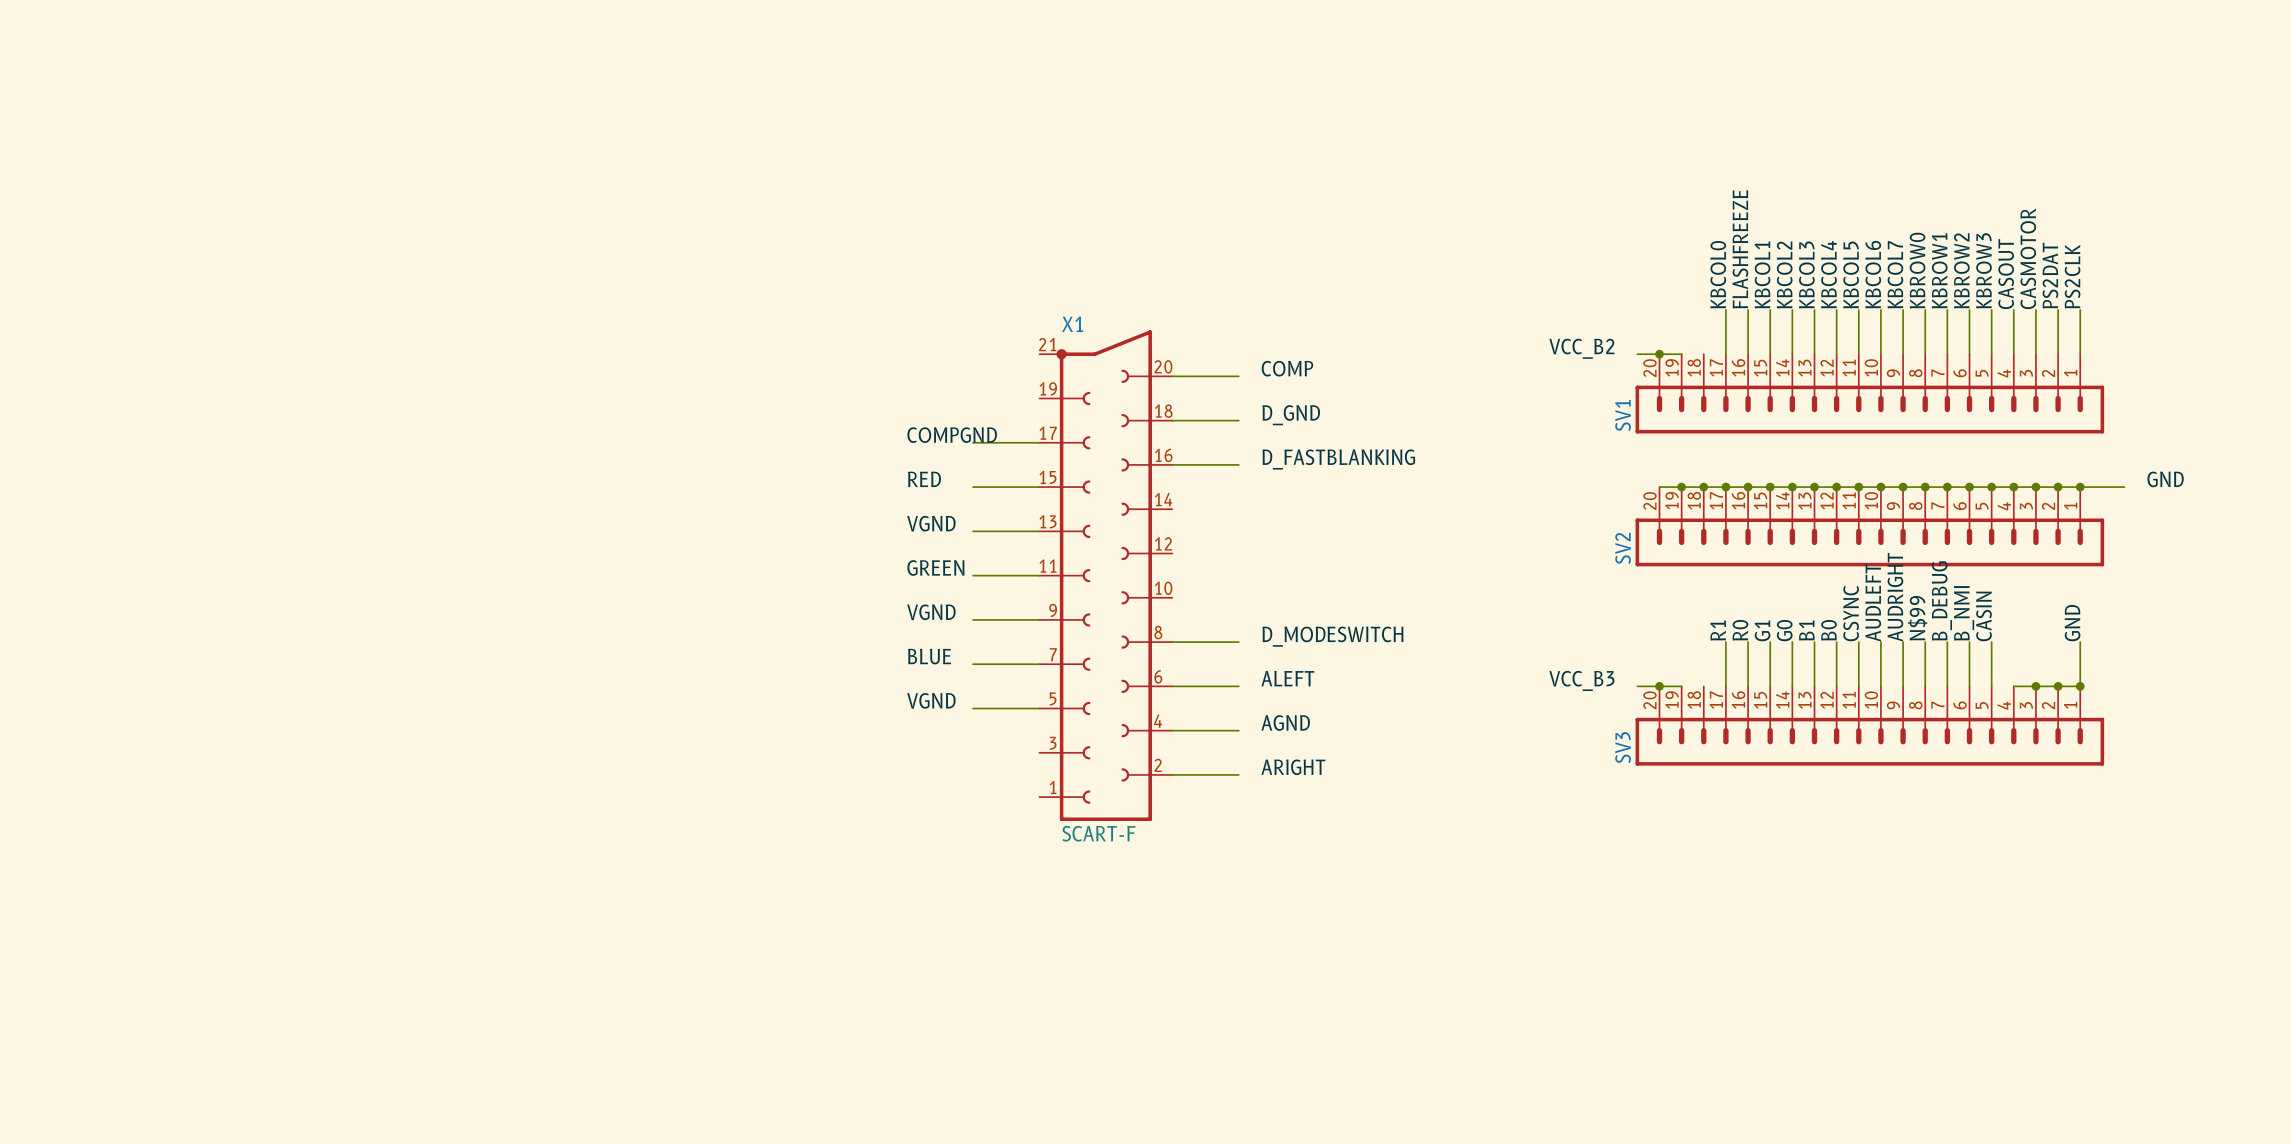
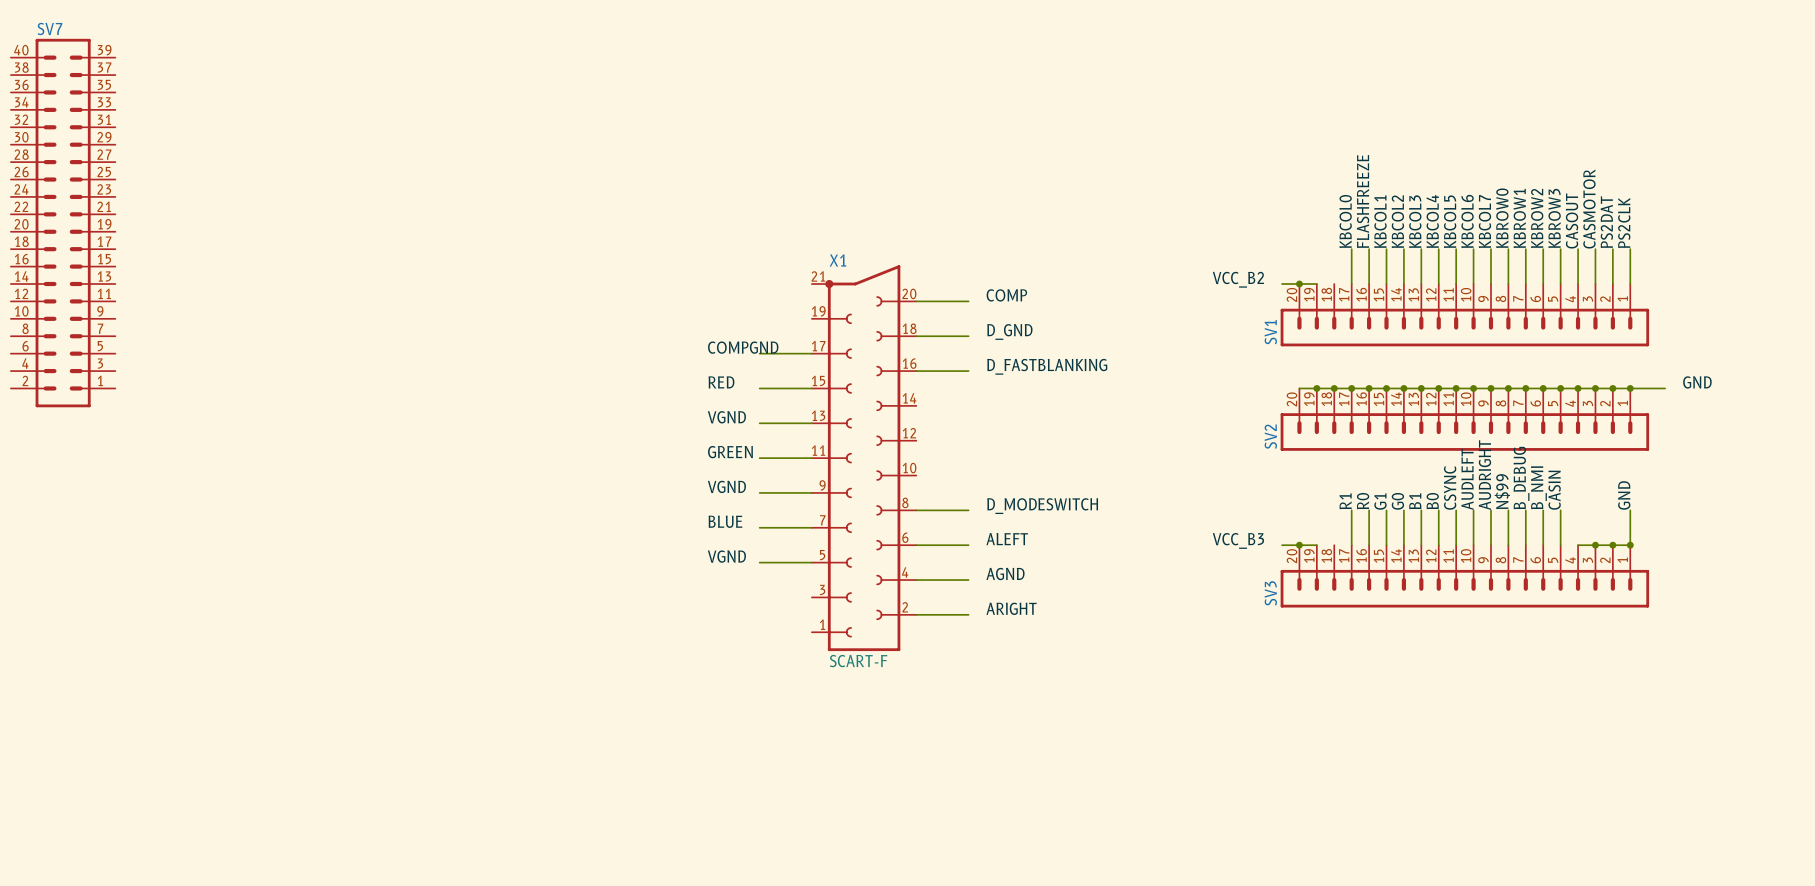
SV7: none -> (63, 223)

